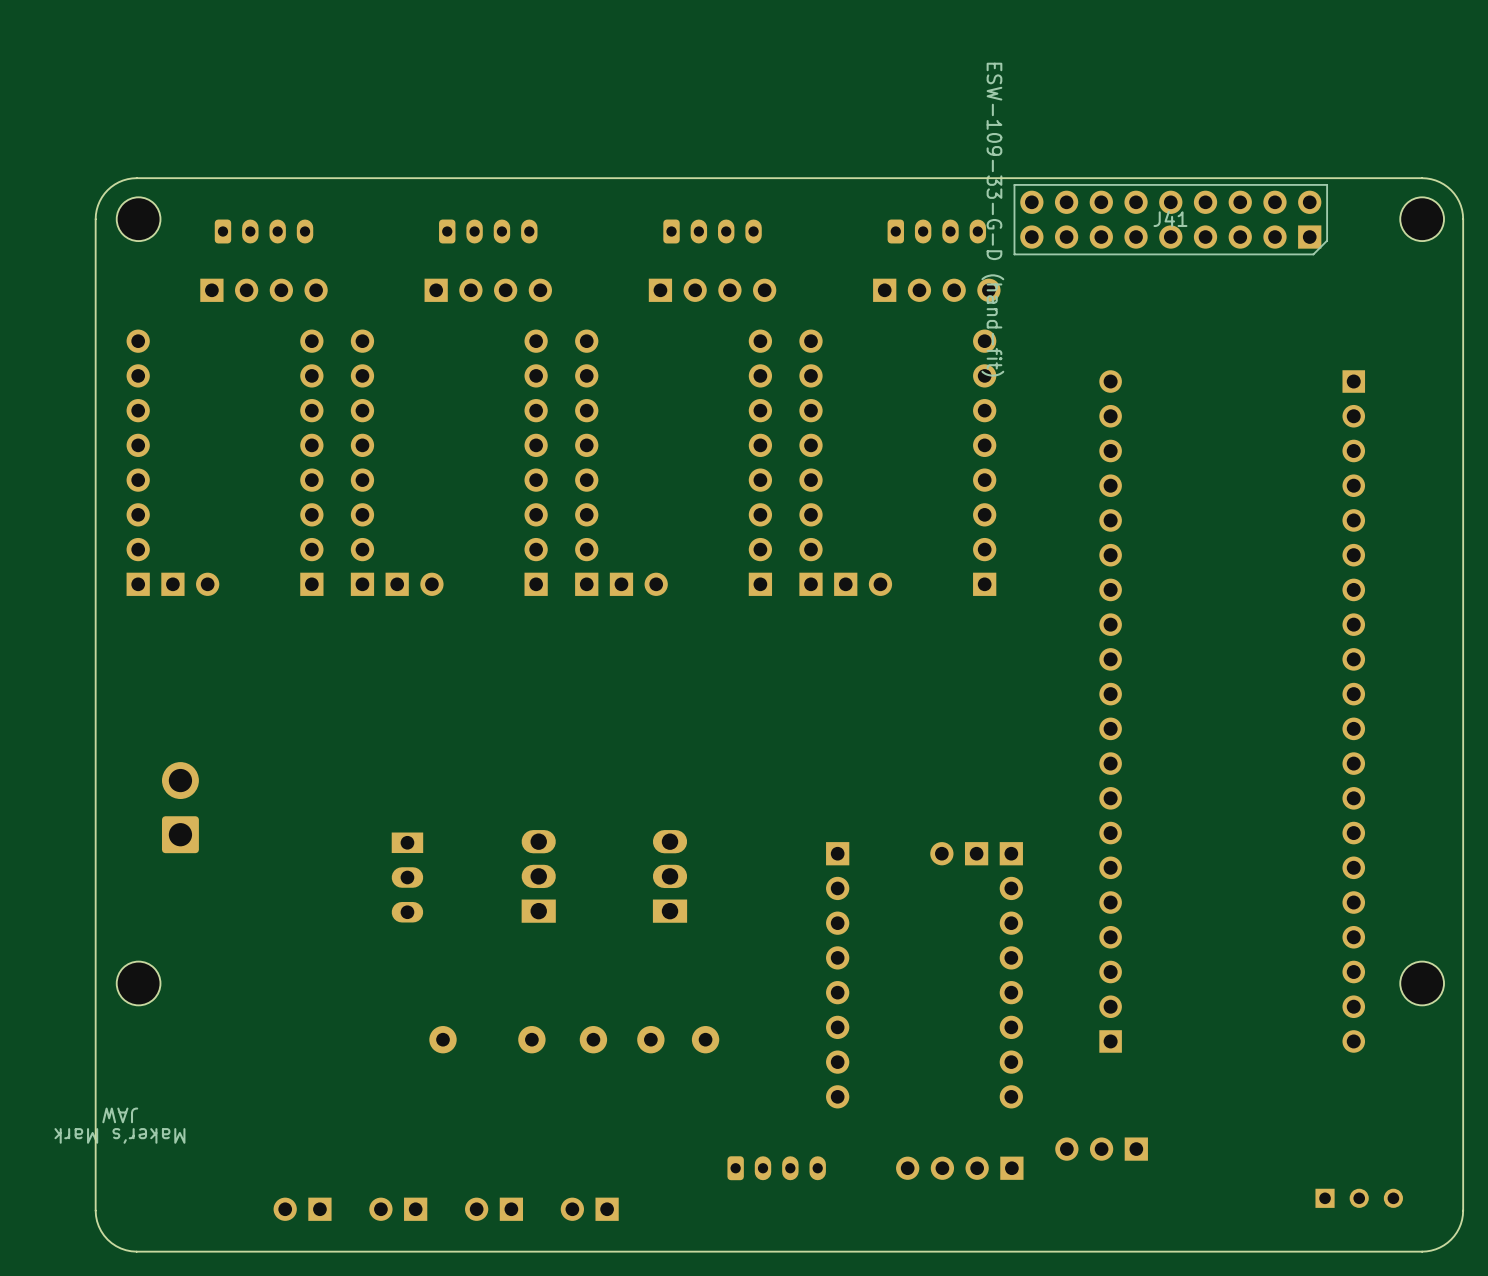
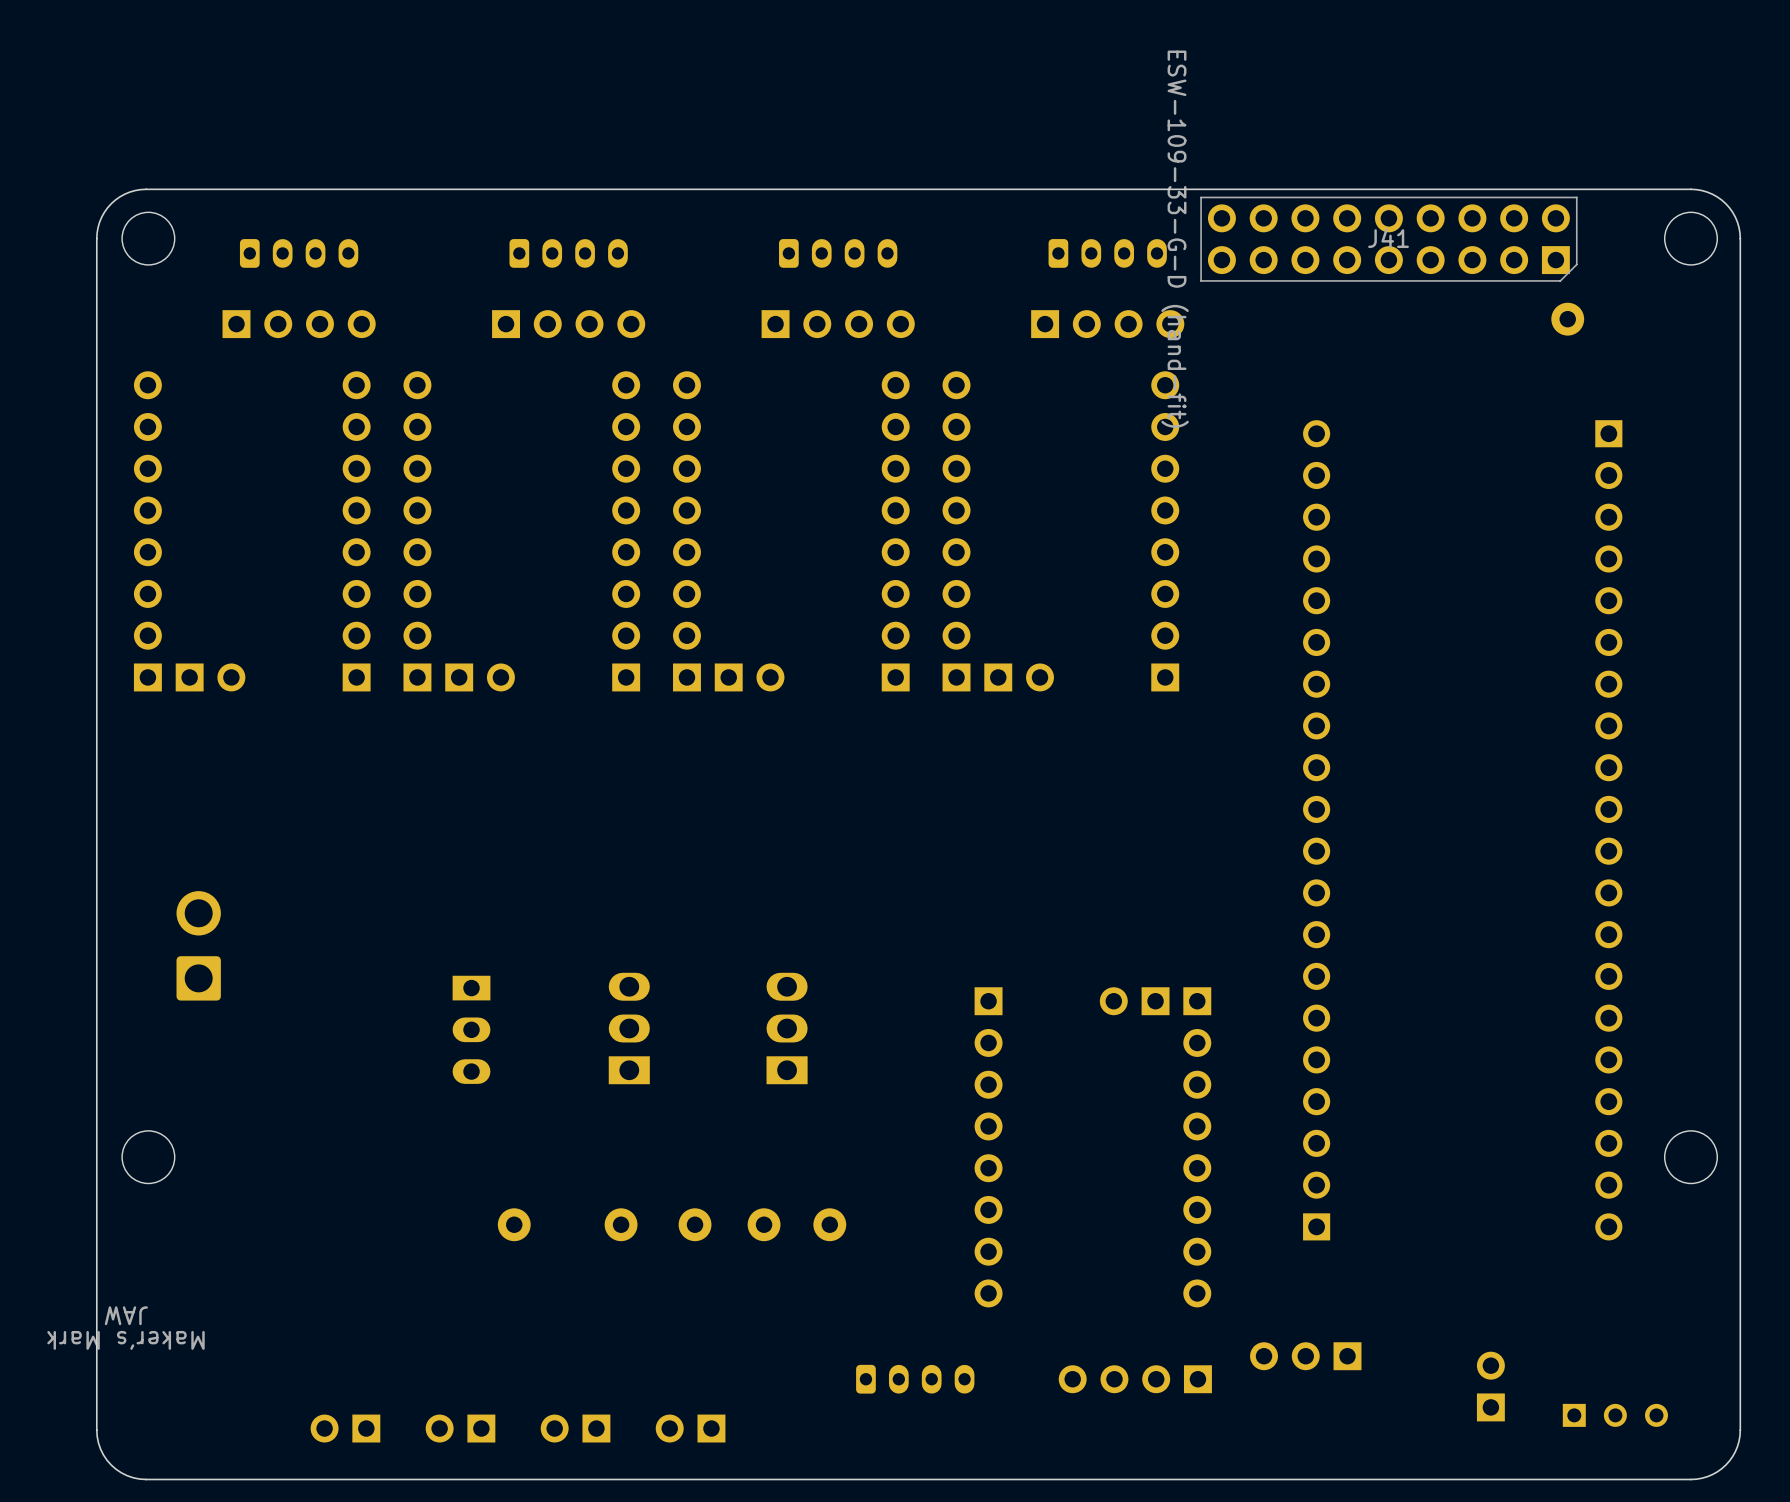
part: none -> (1567, 319)
part: none -> (1490, 1386)

